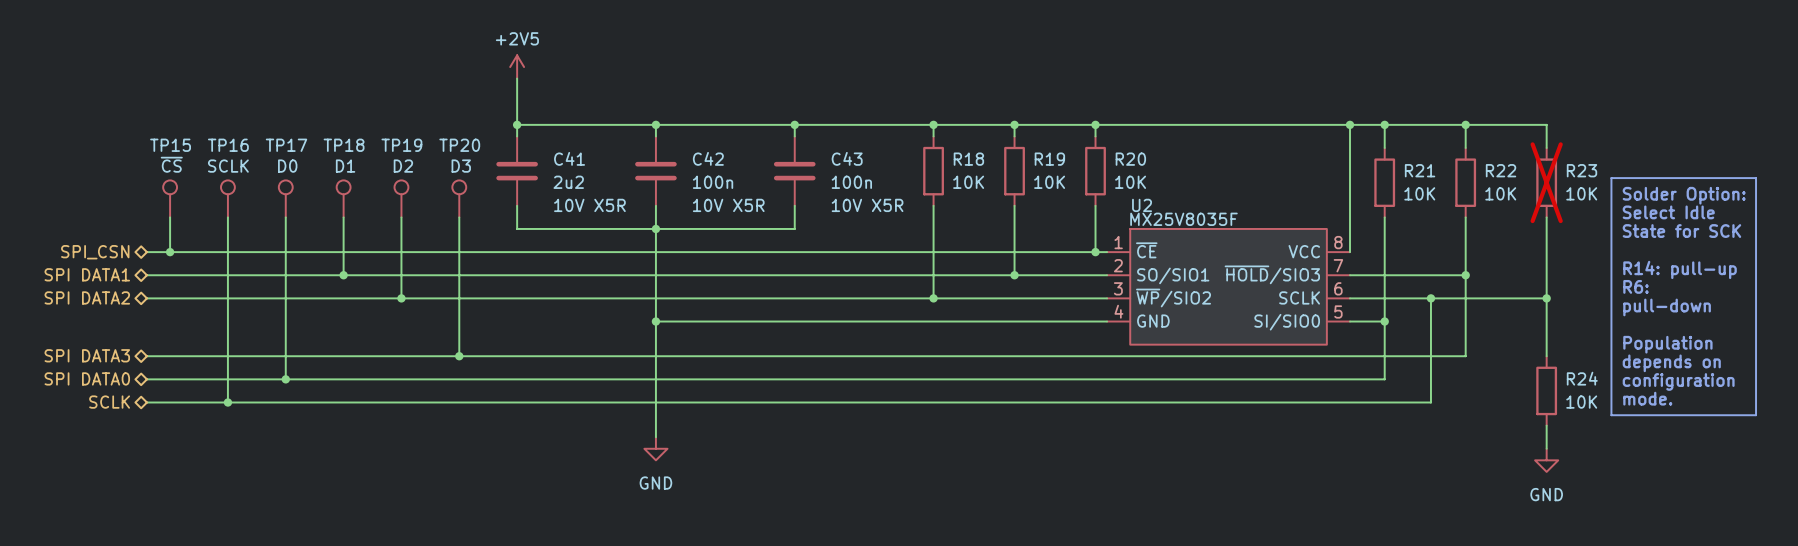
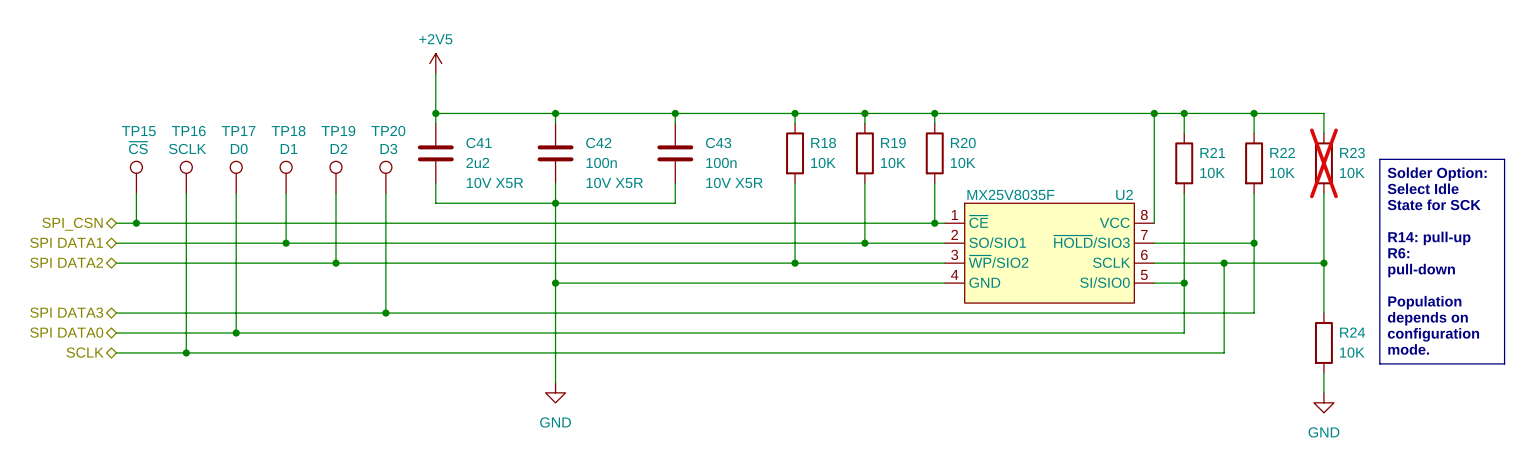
U2 name position: U2 (1142, 205) -> U2 (1124, 194)

